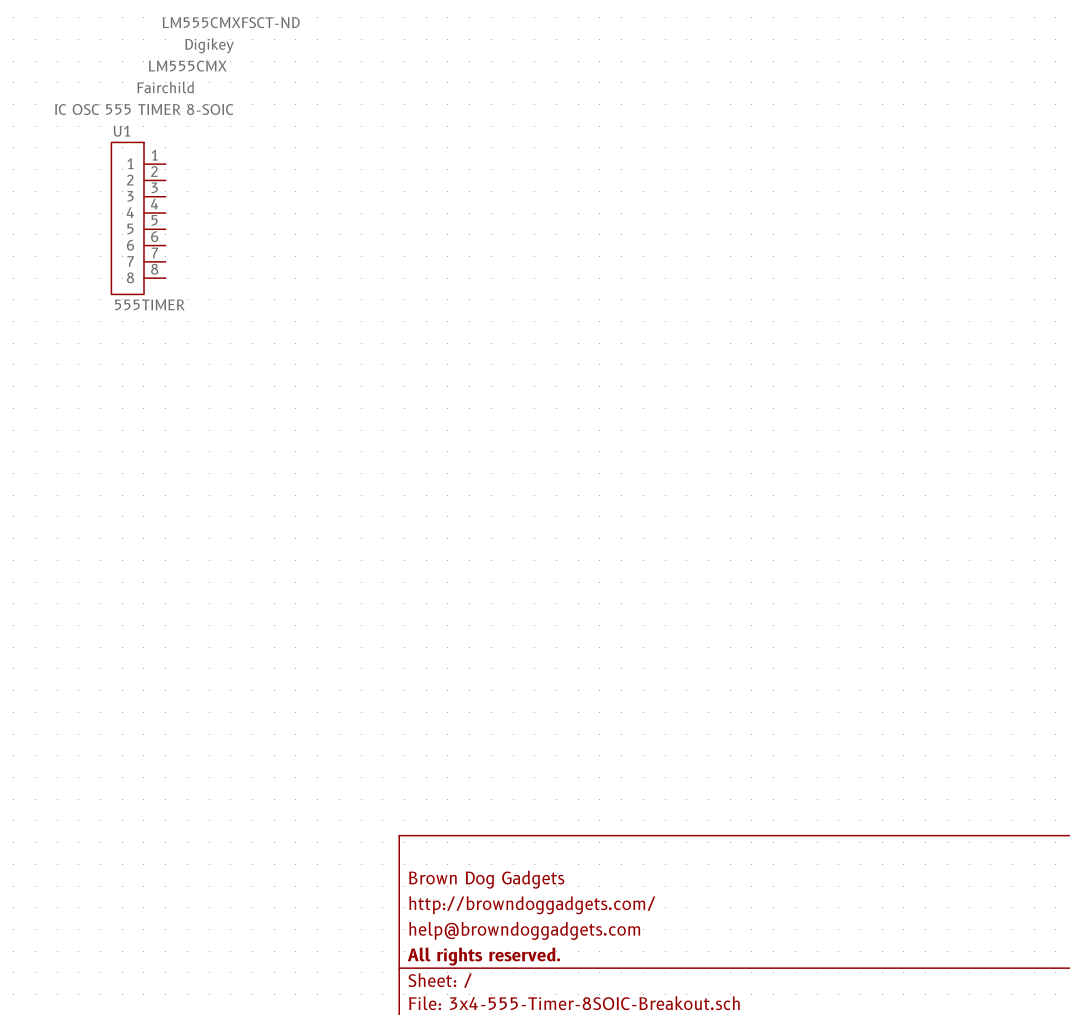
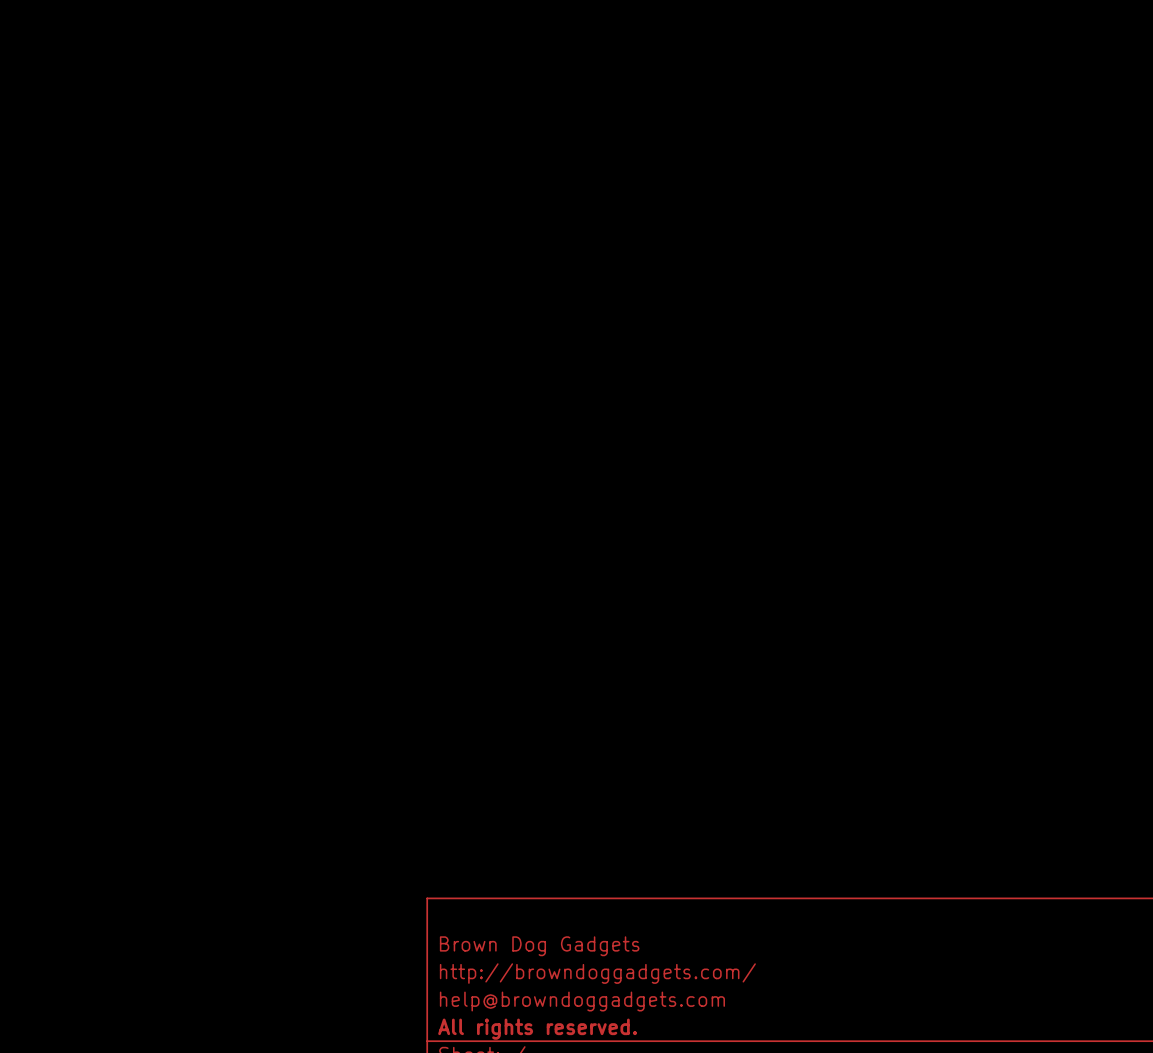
U1: 555TIMER (138, 218) -> none

